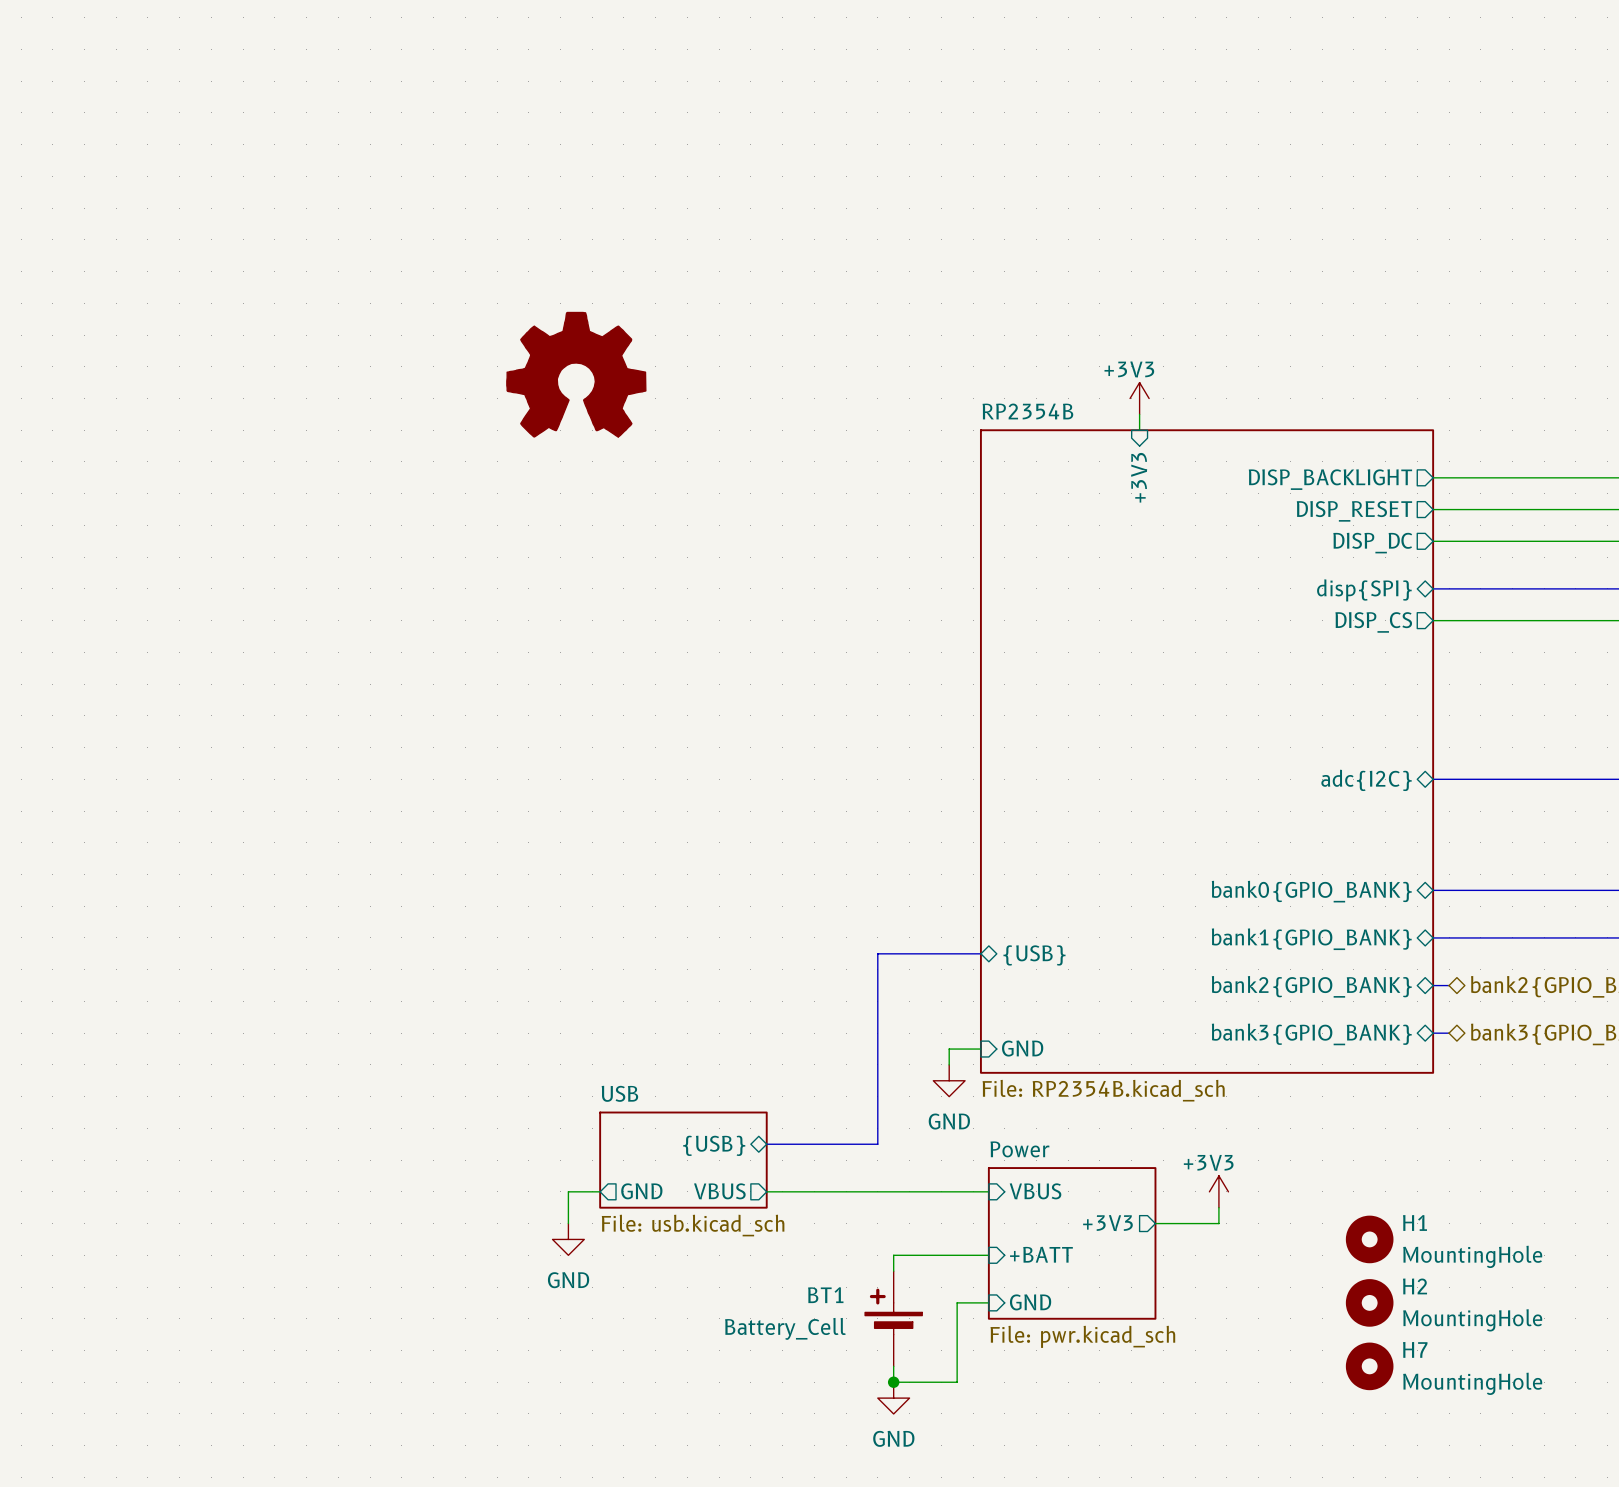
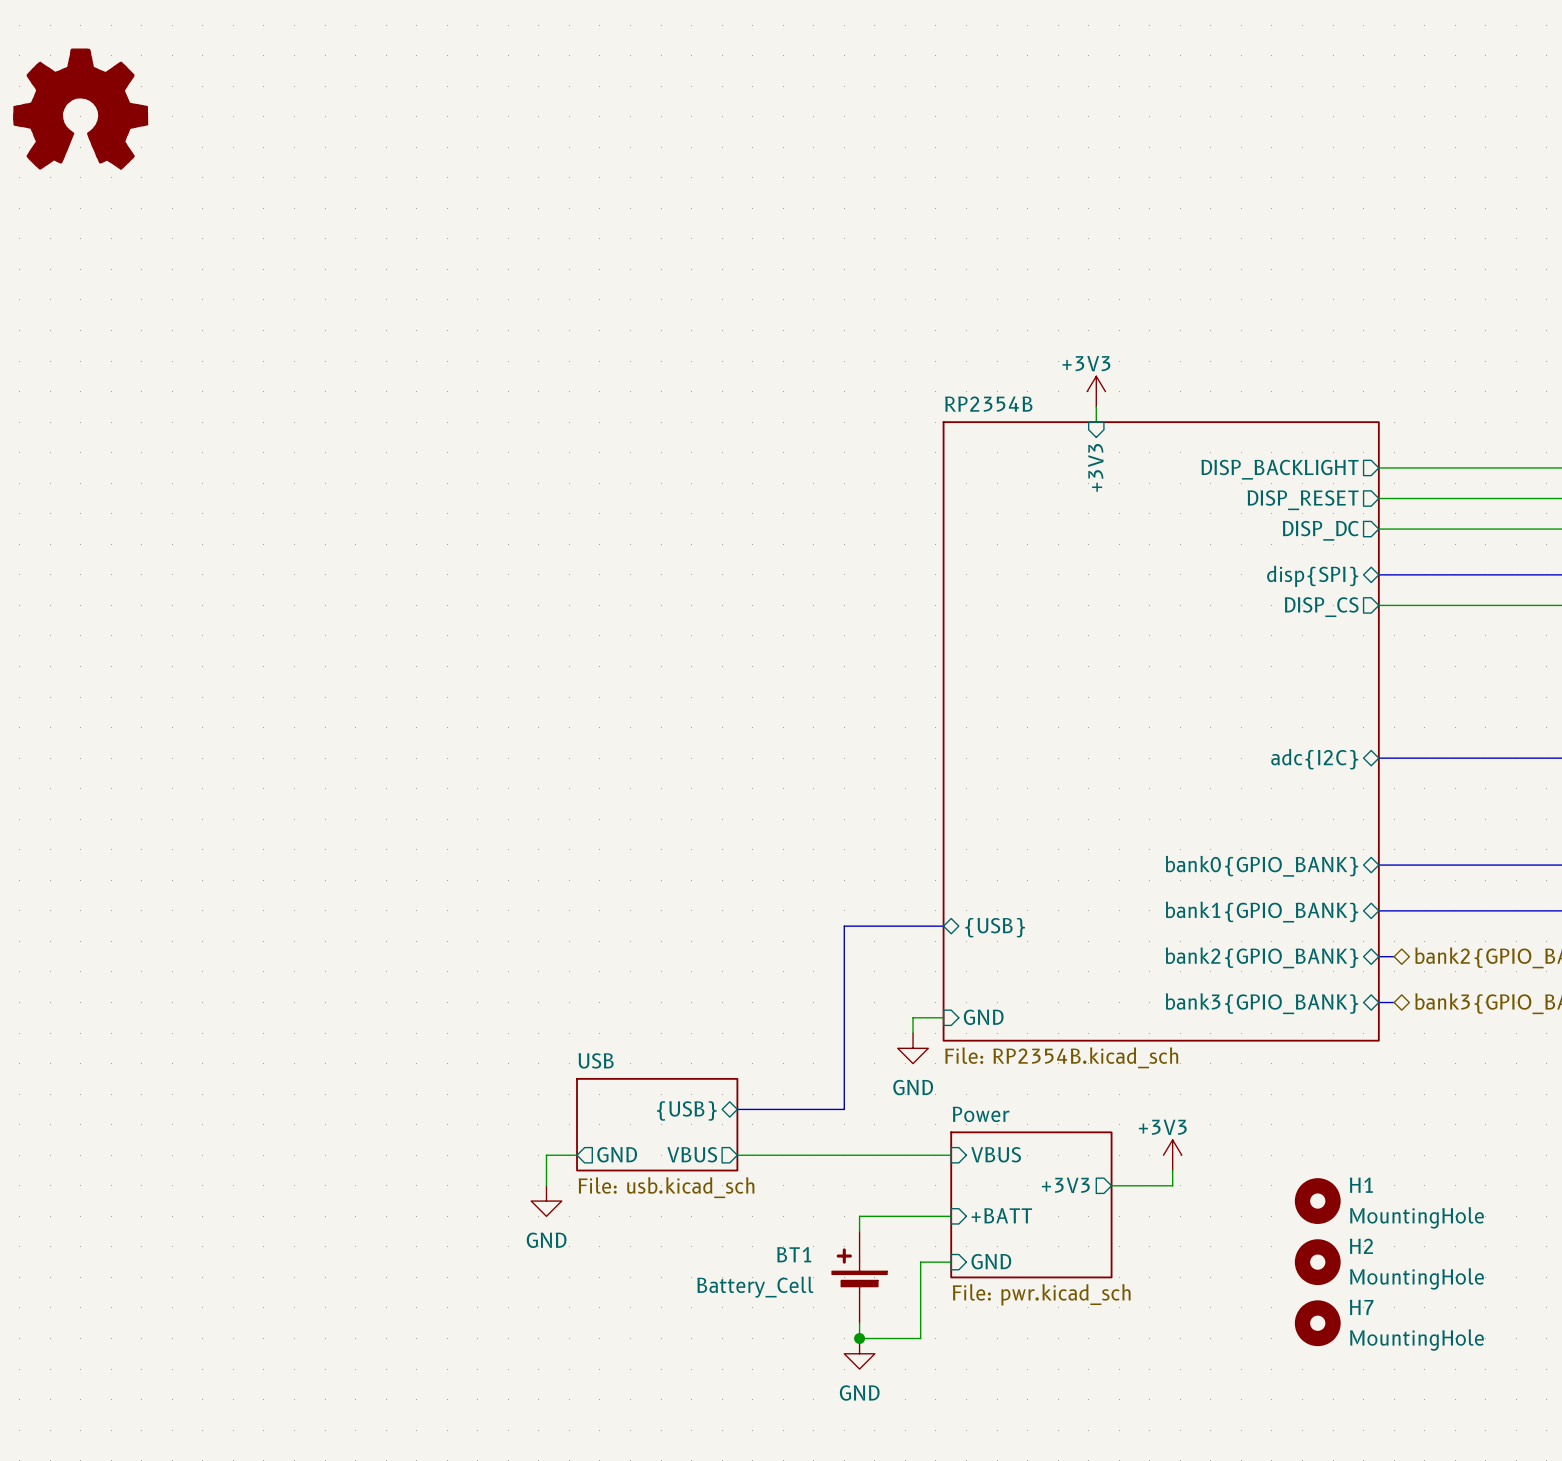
part: none -> (80, 109)
part: (576, 374) -> none

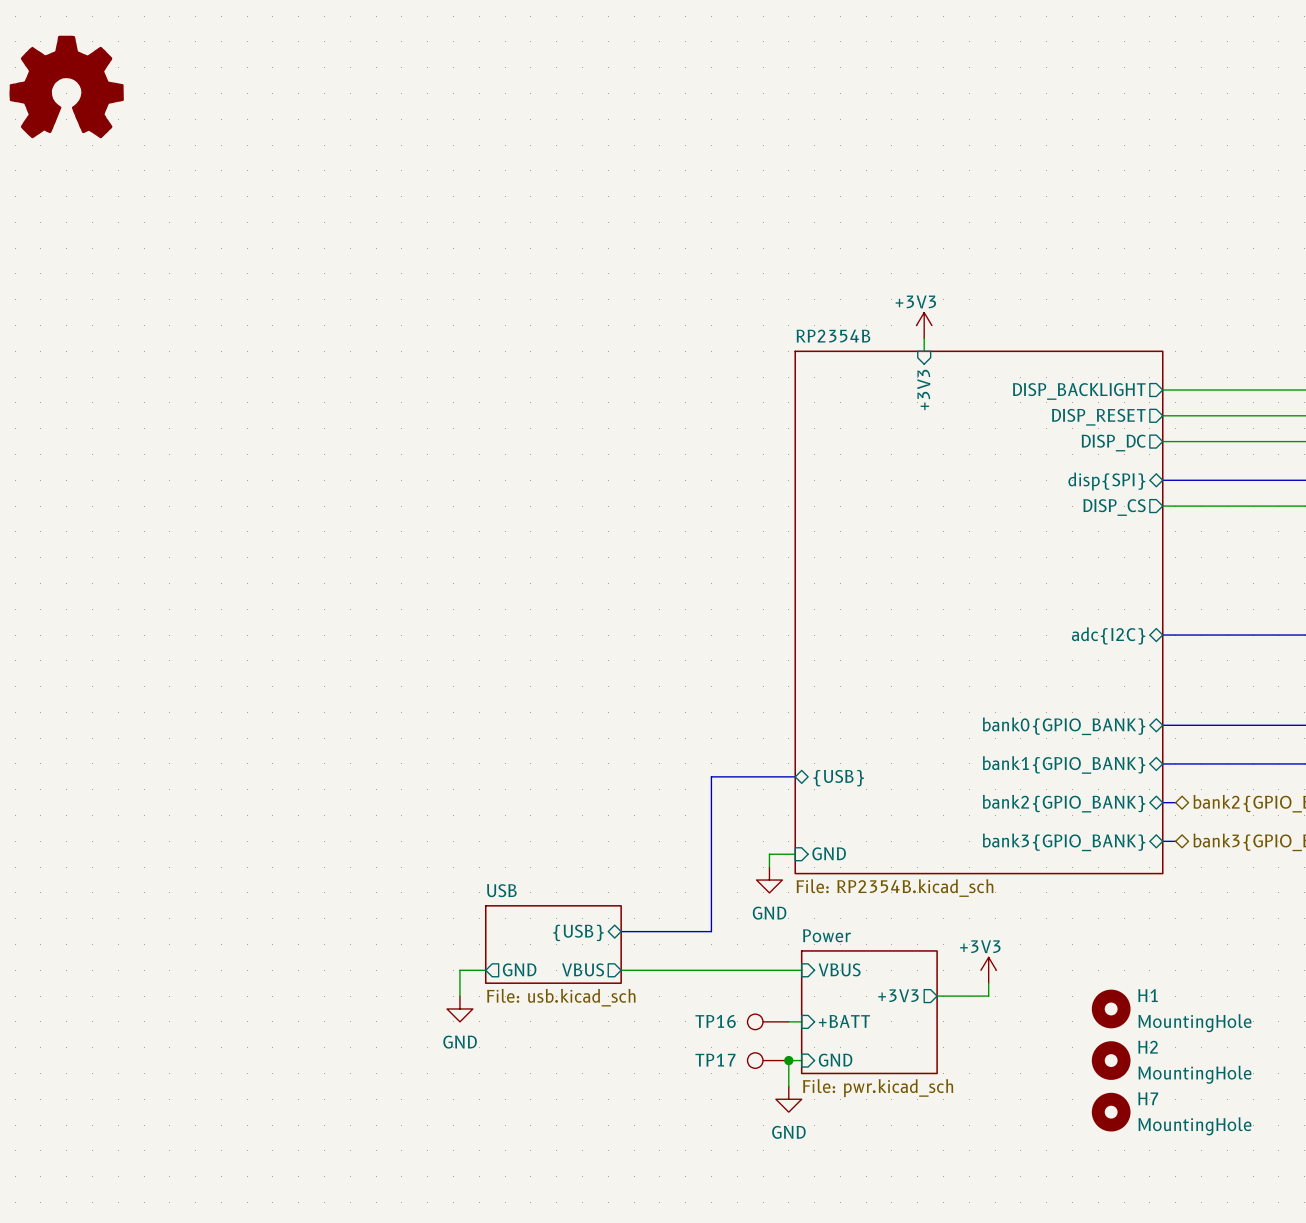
TP16: none -> (768, 1021)
wire: (935, 1216) (859, 1216) (859, 1231) -> none
TP17: none -> (768, 1060)
wire: (935, 1262) (920, 1262) (920, 1338) (859, 1338) (859, 1323) -> (788, 1060) (788, 1086)
junction: none -> (788, 1060)
BT1: Battery_Cell (859, 1277) -> none
junction: (859, 1338) -> none
power symbol position: GND (859, 1353) -> GND (788, 1099)

